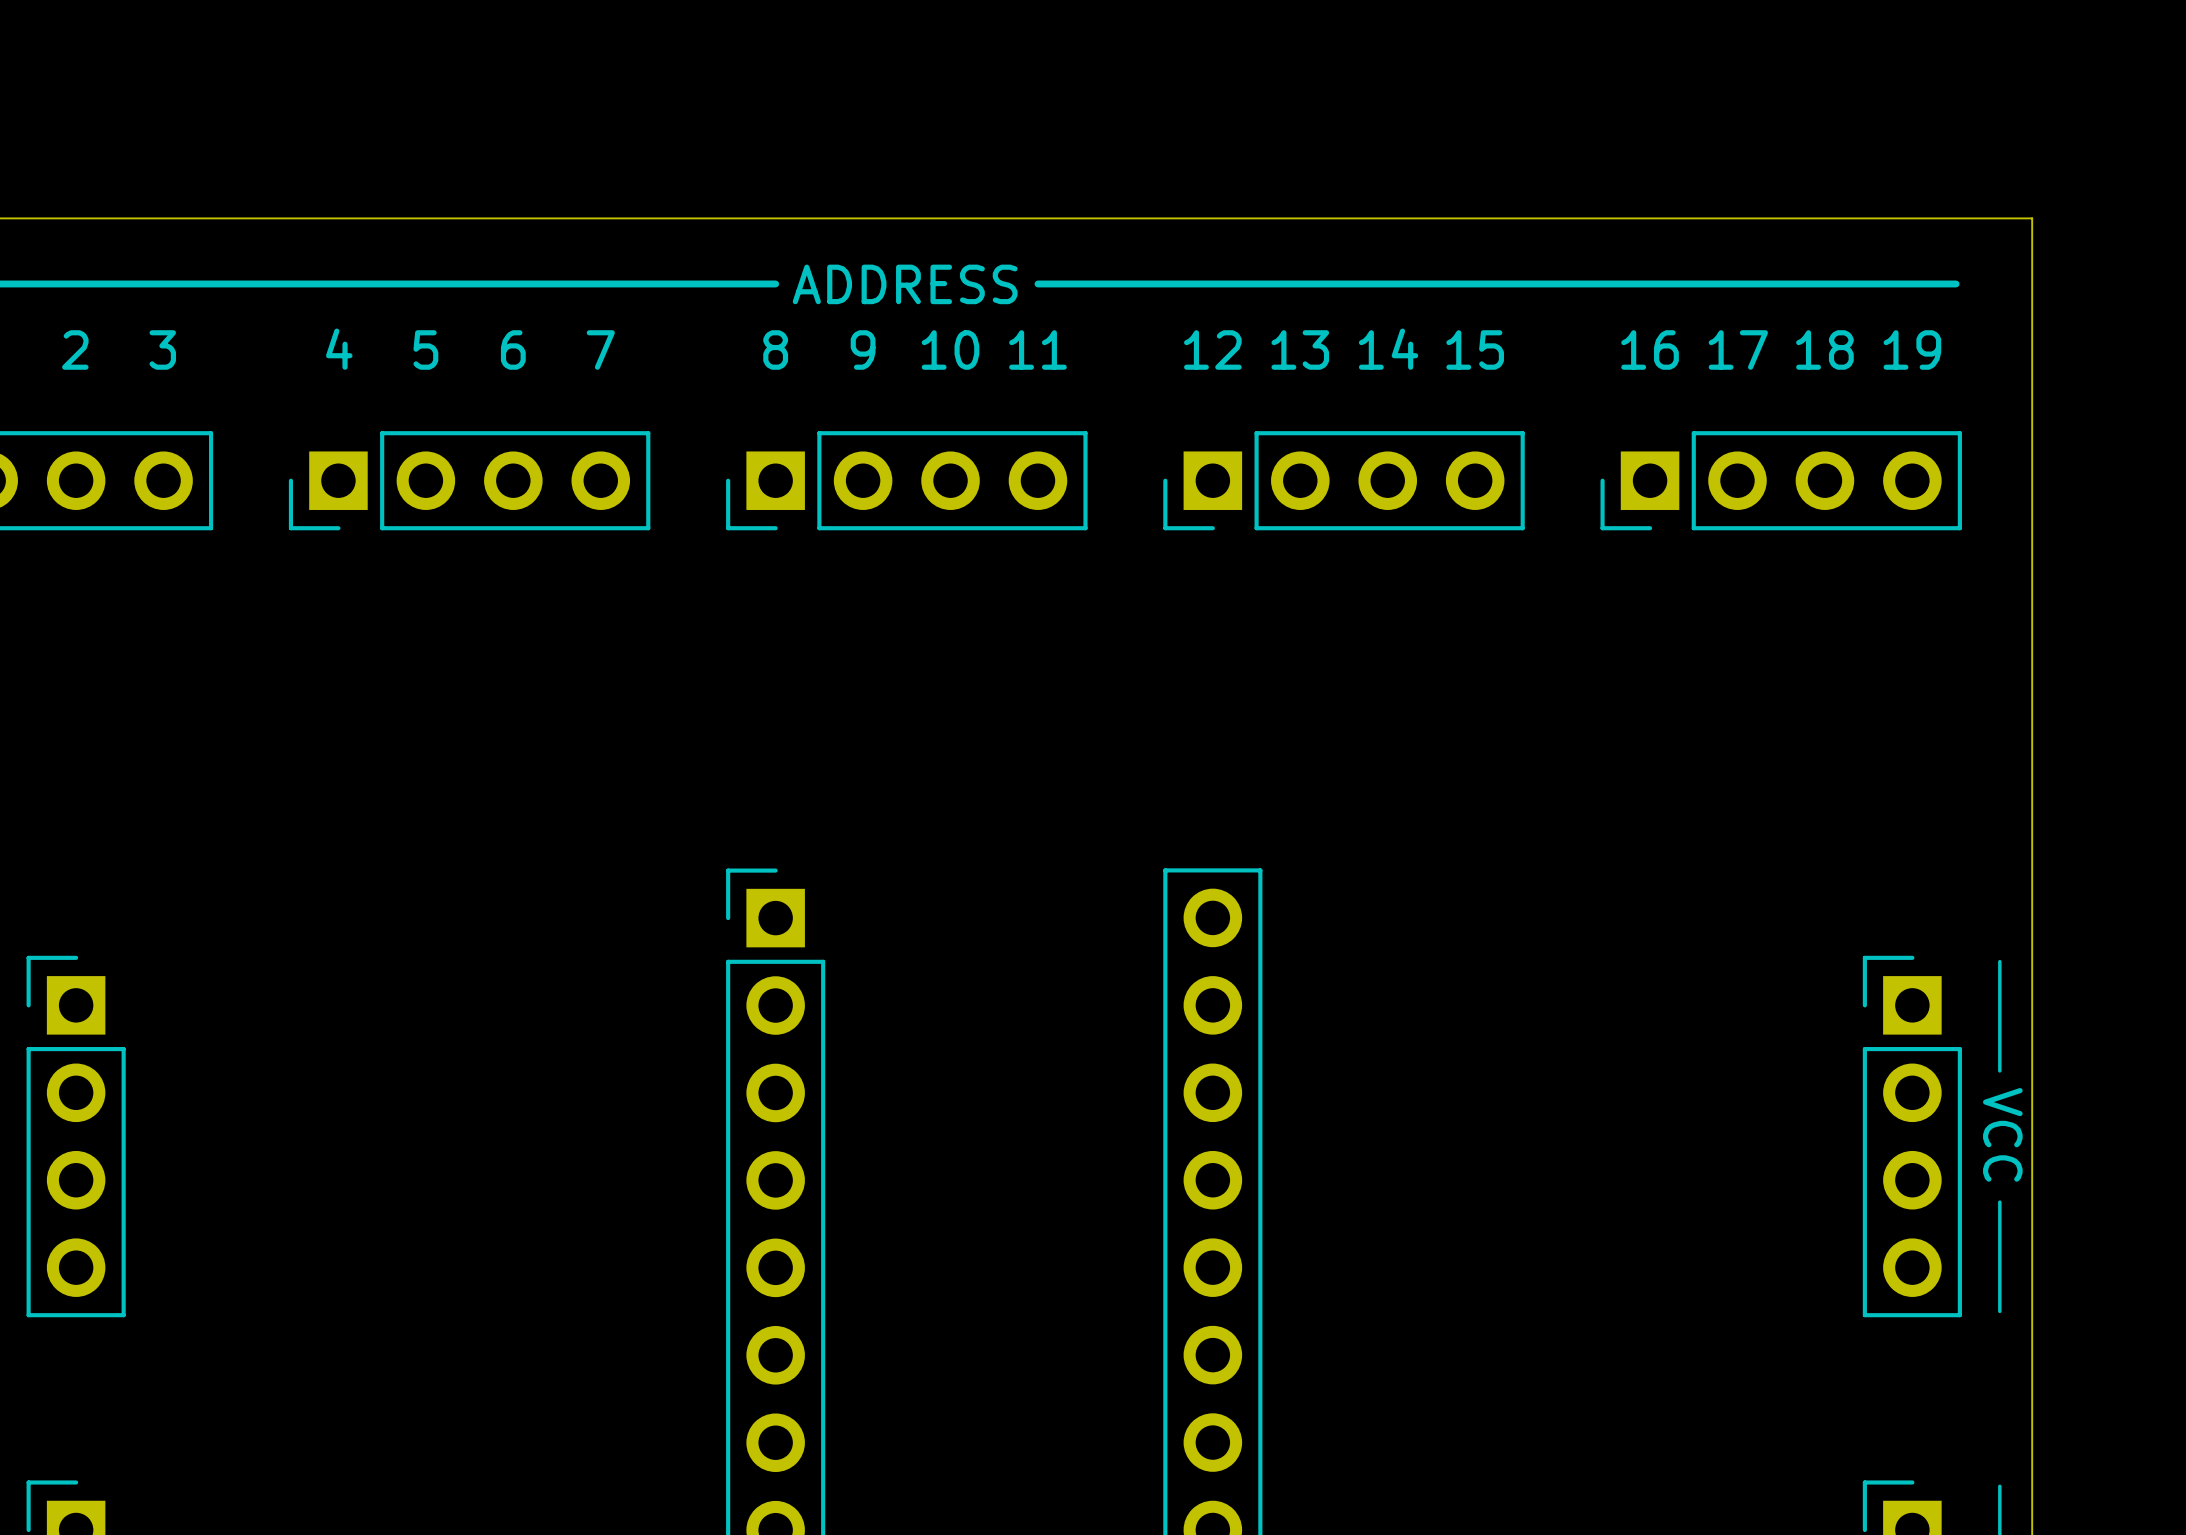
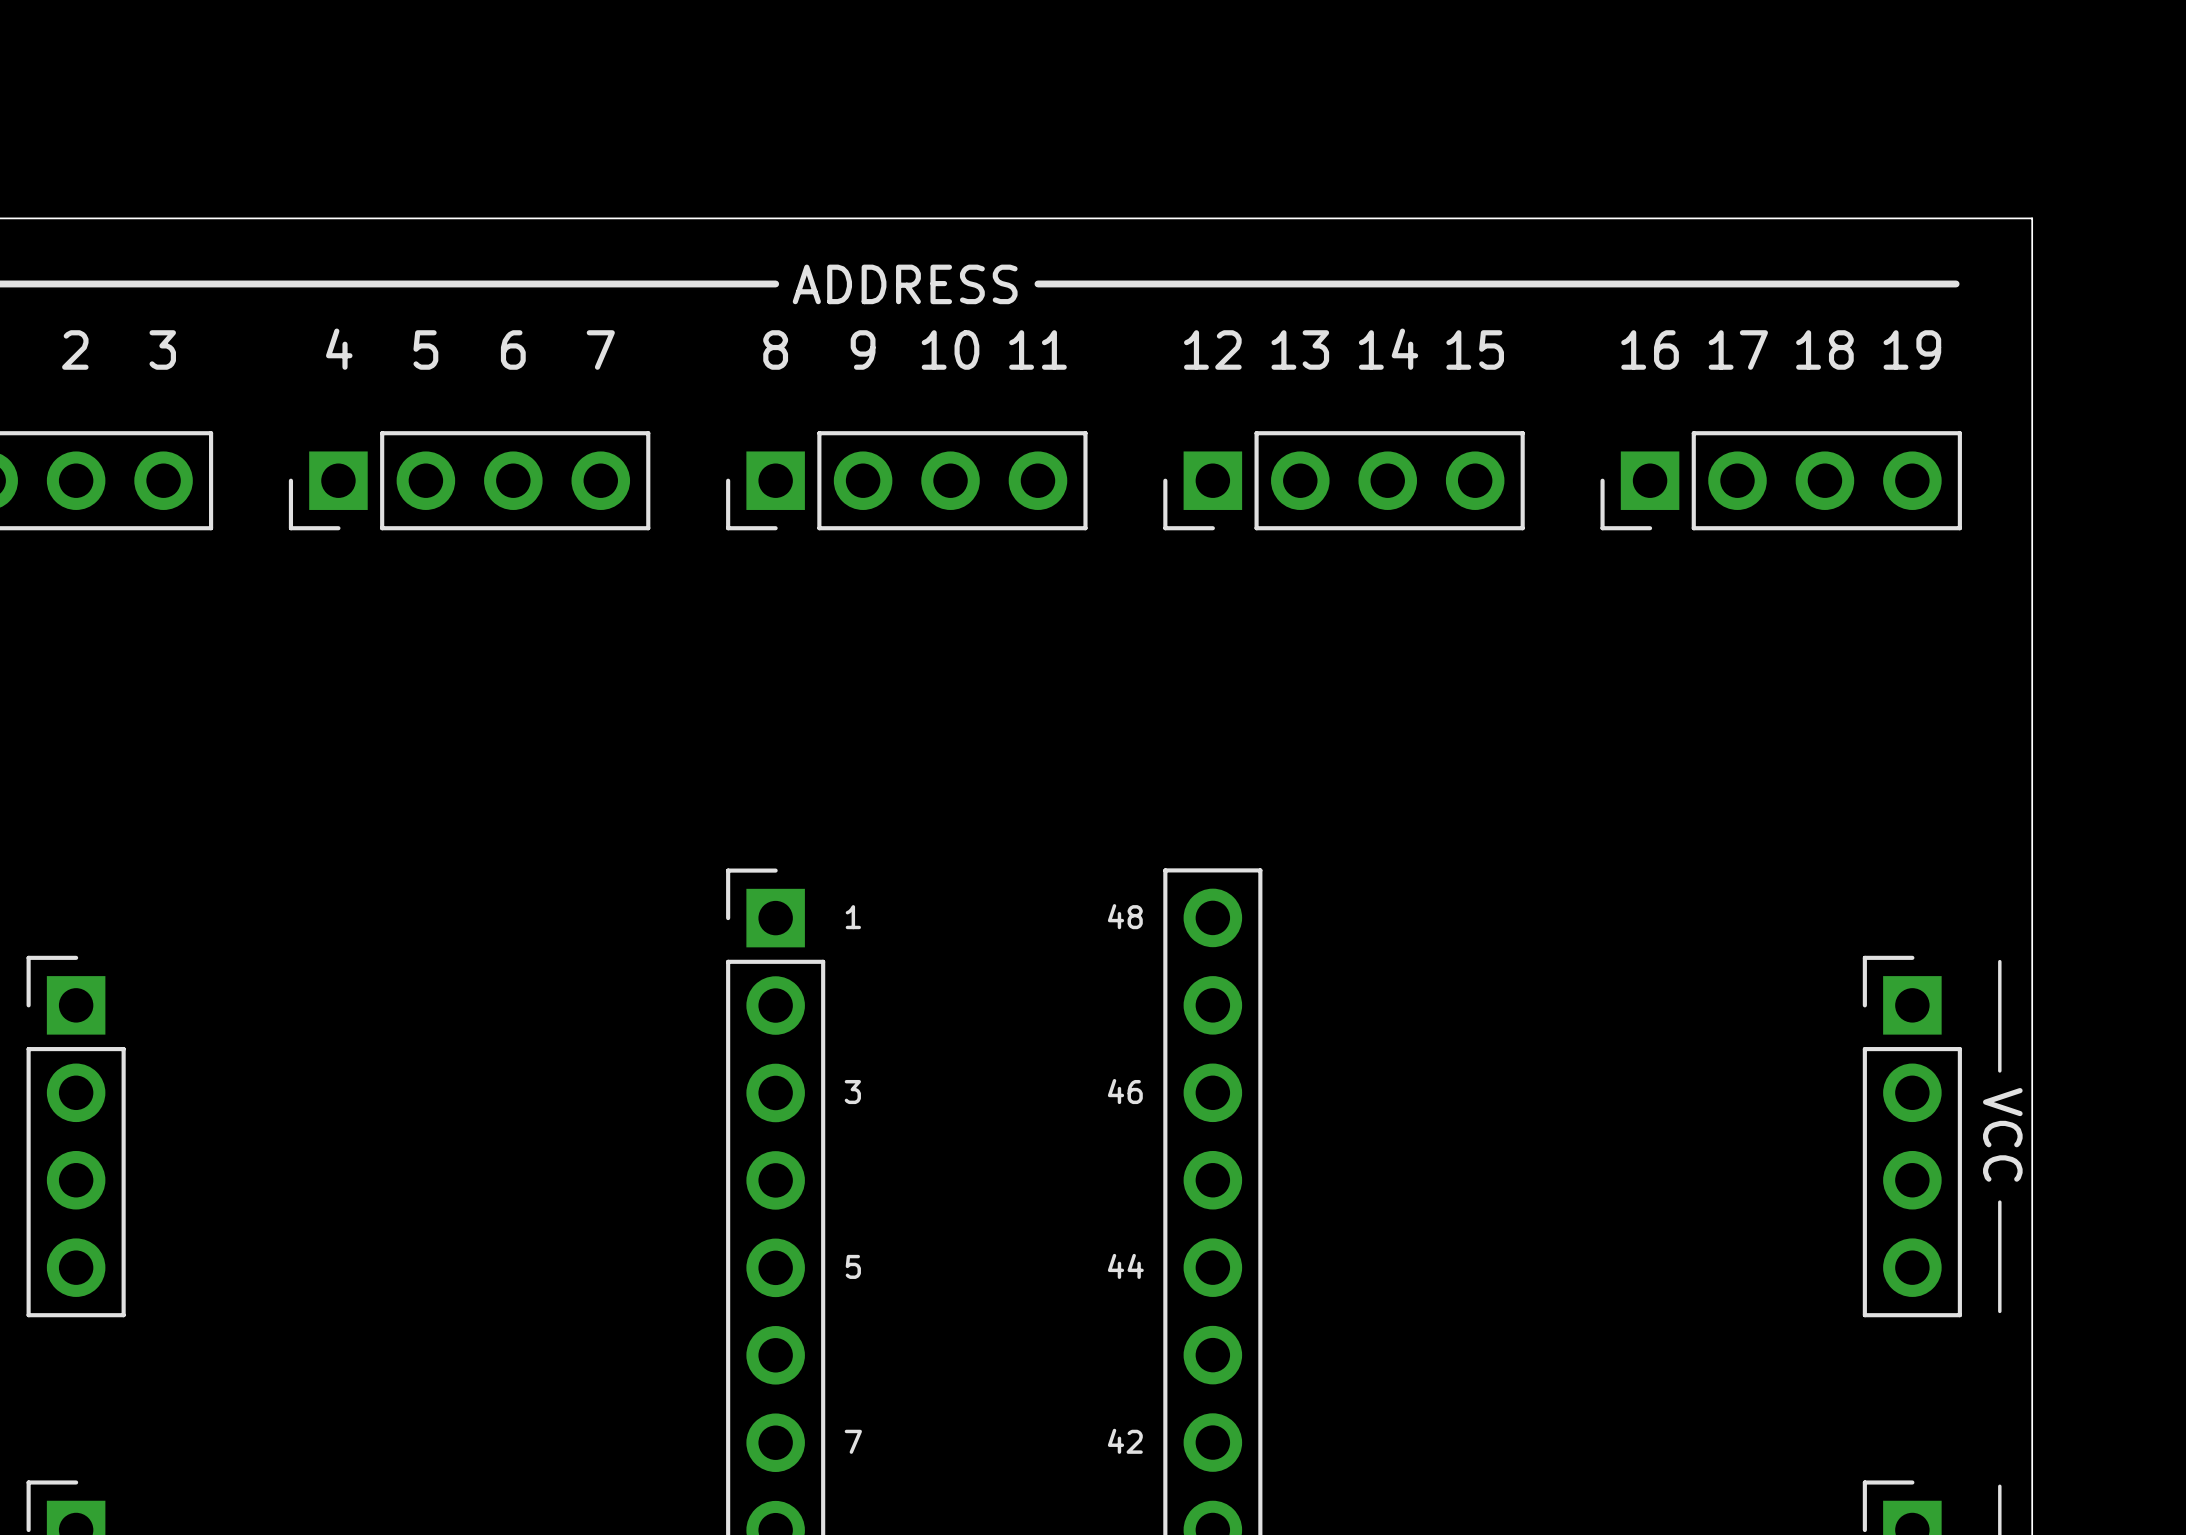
text: none -> 48 (1125, 916)
text: none -> 1 (853, 917)
text: none -> 46 (1125, 1091)
text: none -> 3 (852, 1092)
text: none -> 5 (853, 1266)
text: none -> 44 (1125, 1266)
text: none -> 7 (853, 1441)
text: none -> 42 (1125, 1441)

